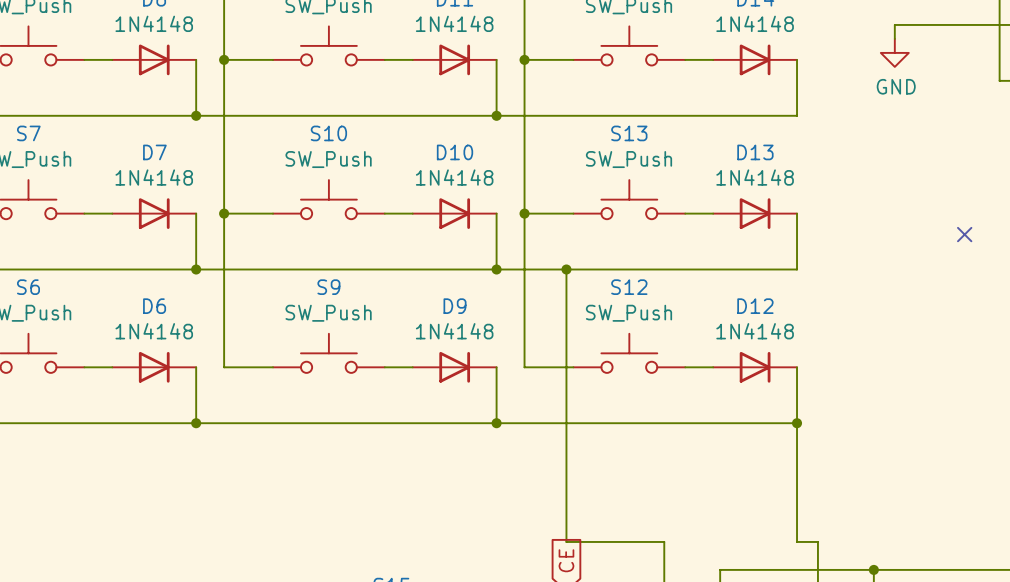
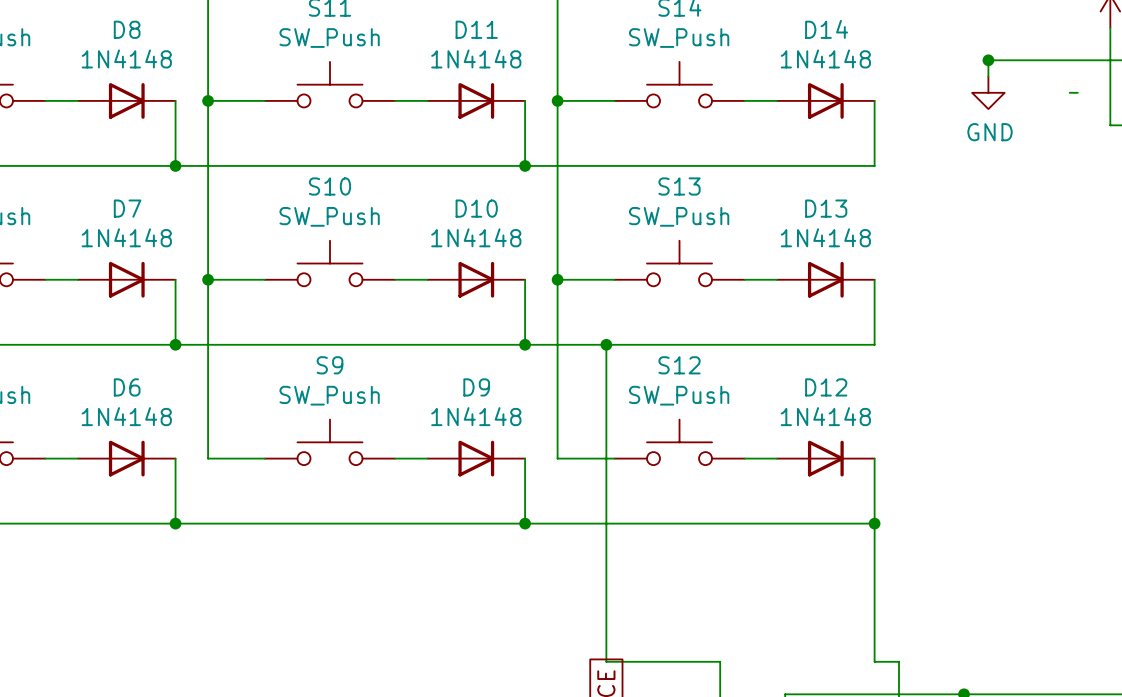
junction: none -> (988, 60)
wire: none -> (1069, 92) (1077, 92)
no-connect mark: (964, 234) -> none

